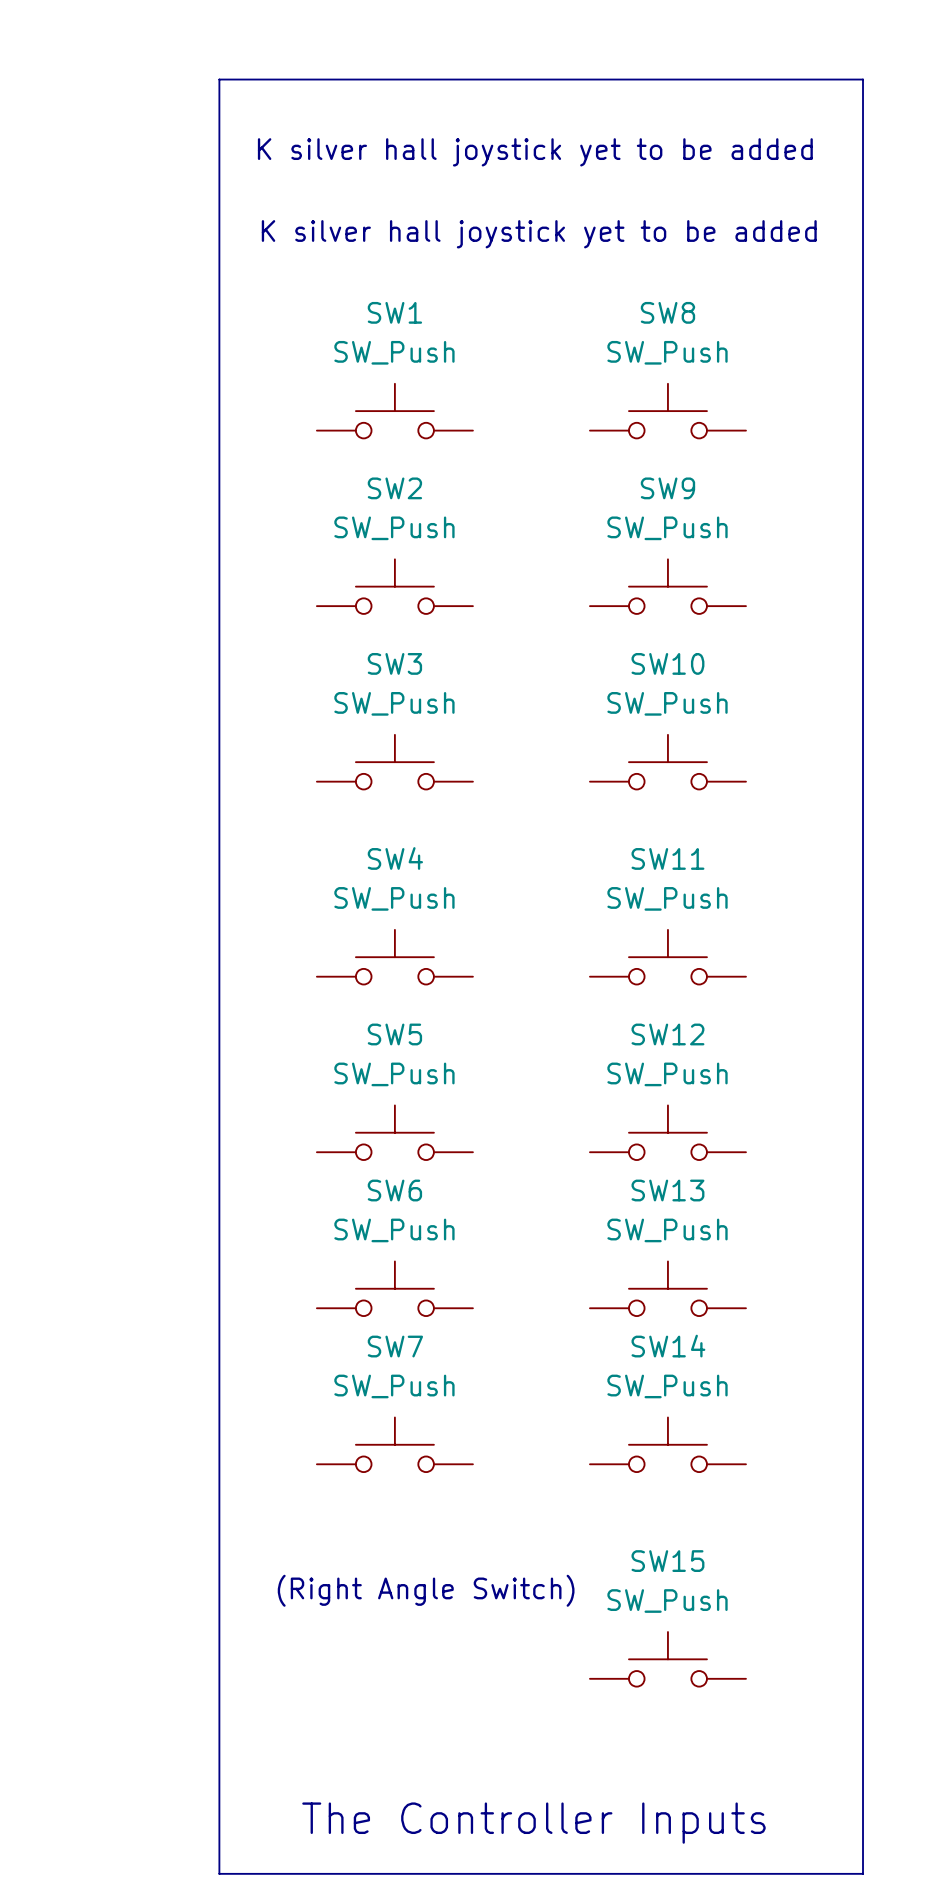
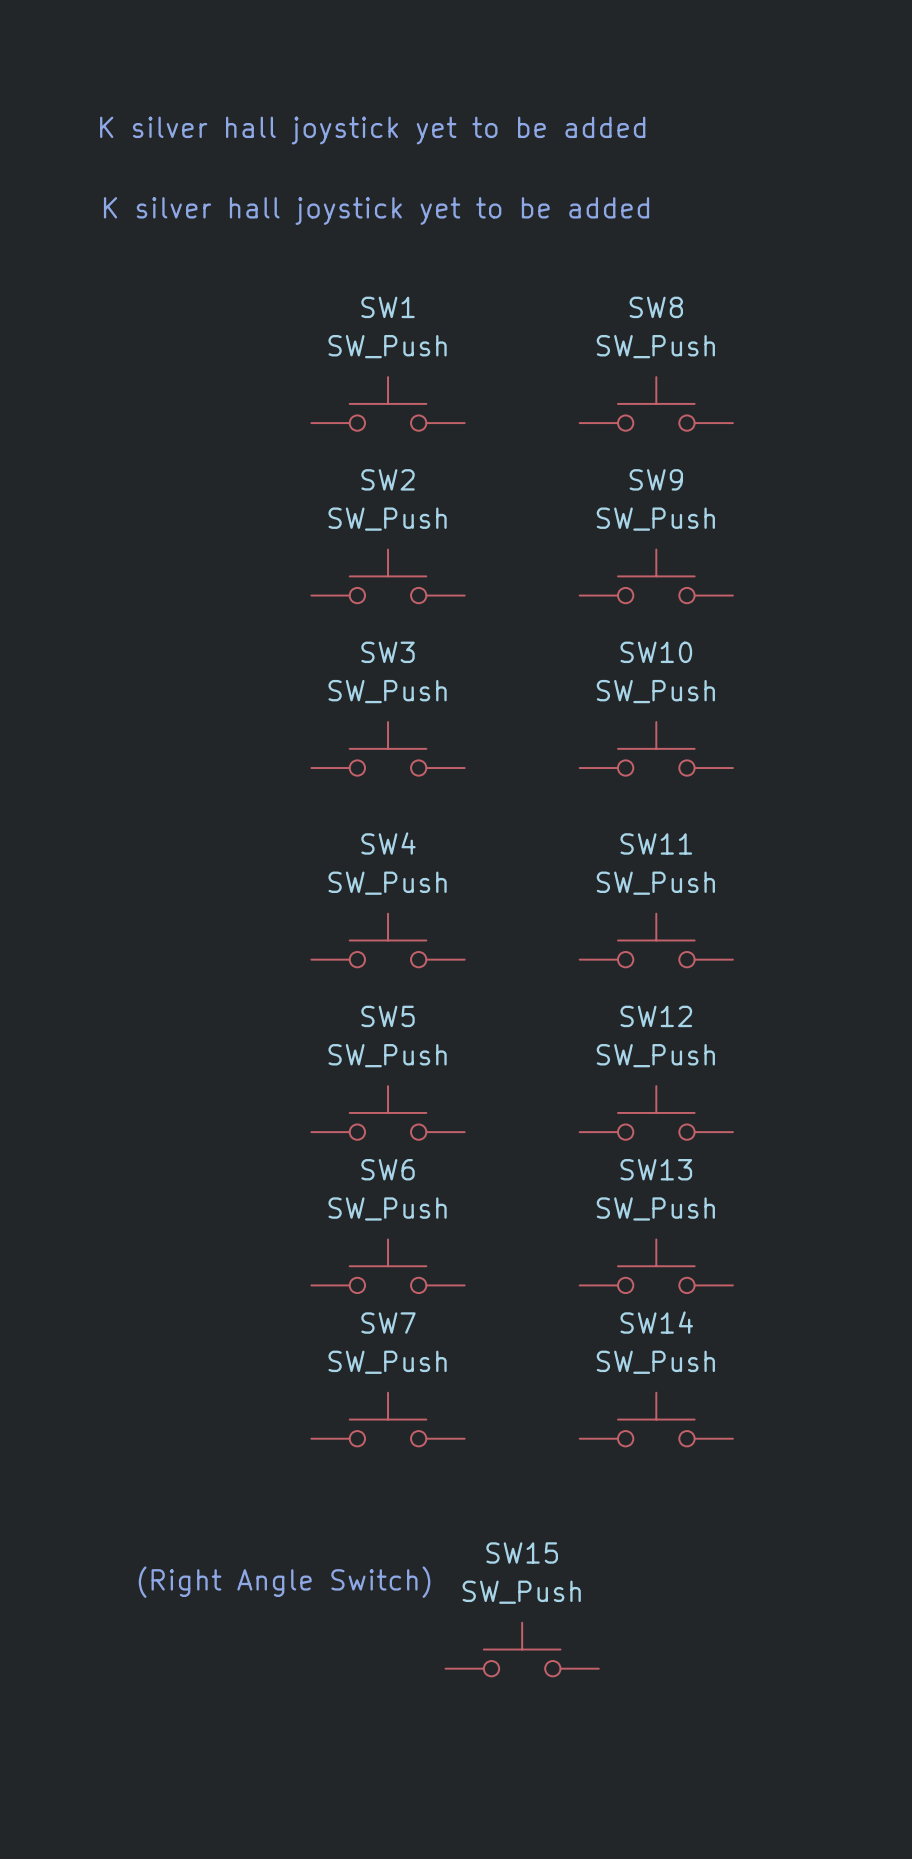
line: (219, 79) (863, 79) (863, 1873) (219, 1873) (219, 79) -> none
text position: K silver hall joystick yet to be added (535, 152) -> K silver hall joystick yet to be added (372, 130)
text position: K silver hall joystick yet to be added (539, 234) -> K silver hall joystick yet to be added (376, 211)
text position: (Right Angle Switch) (426, 1590) -> (Right Angle Switch) (284, 1582)
SW15 position: (667, 1659) -> (522, 1649)
text: The Controller Inputs (533, 1823) -> none

